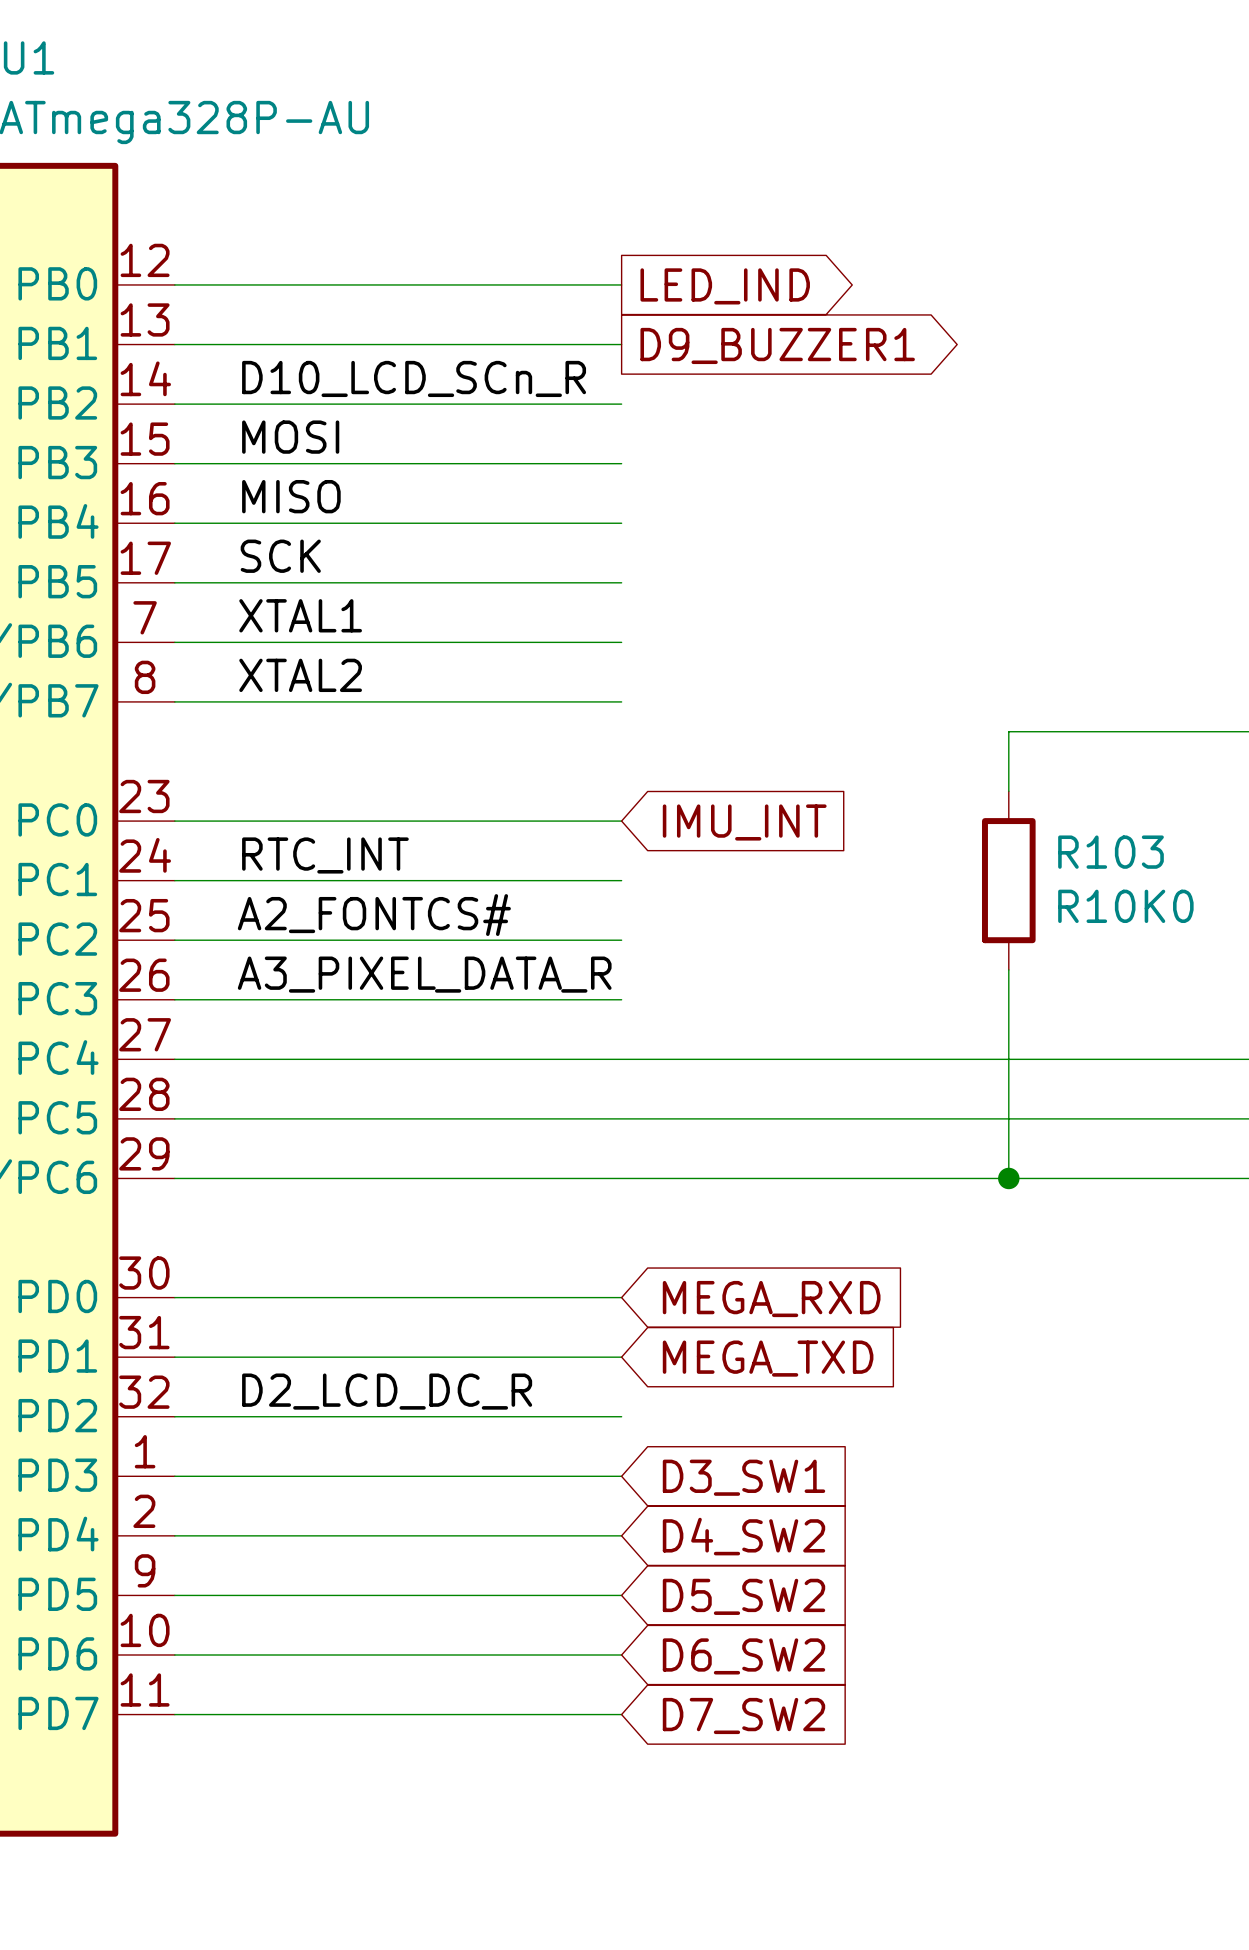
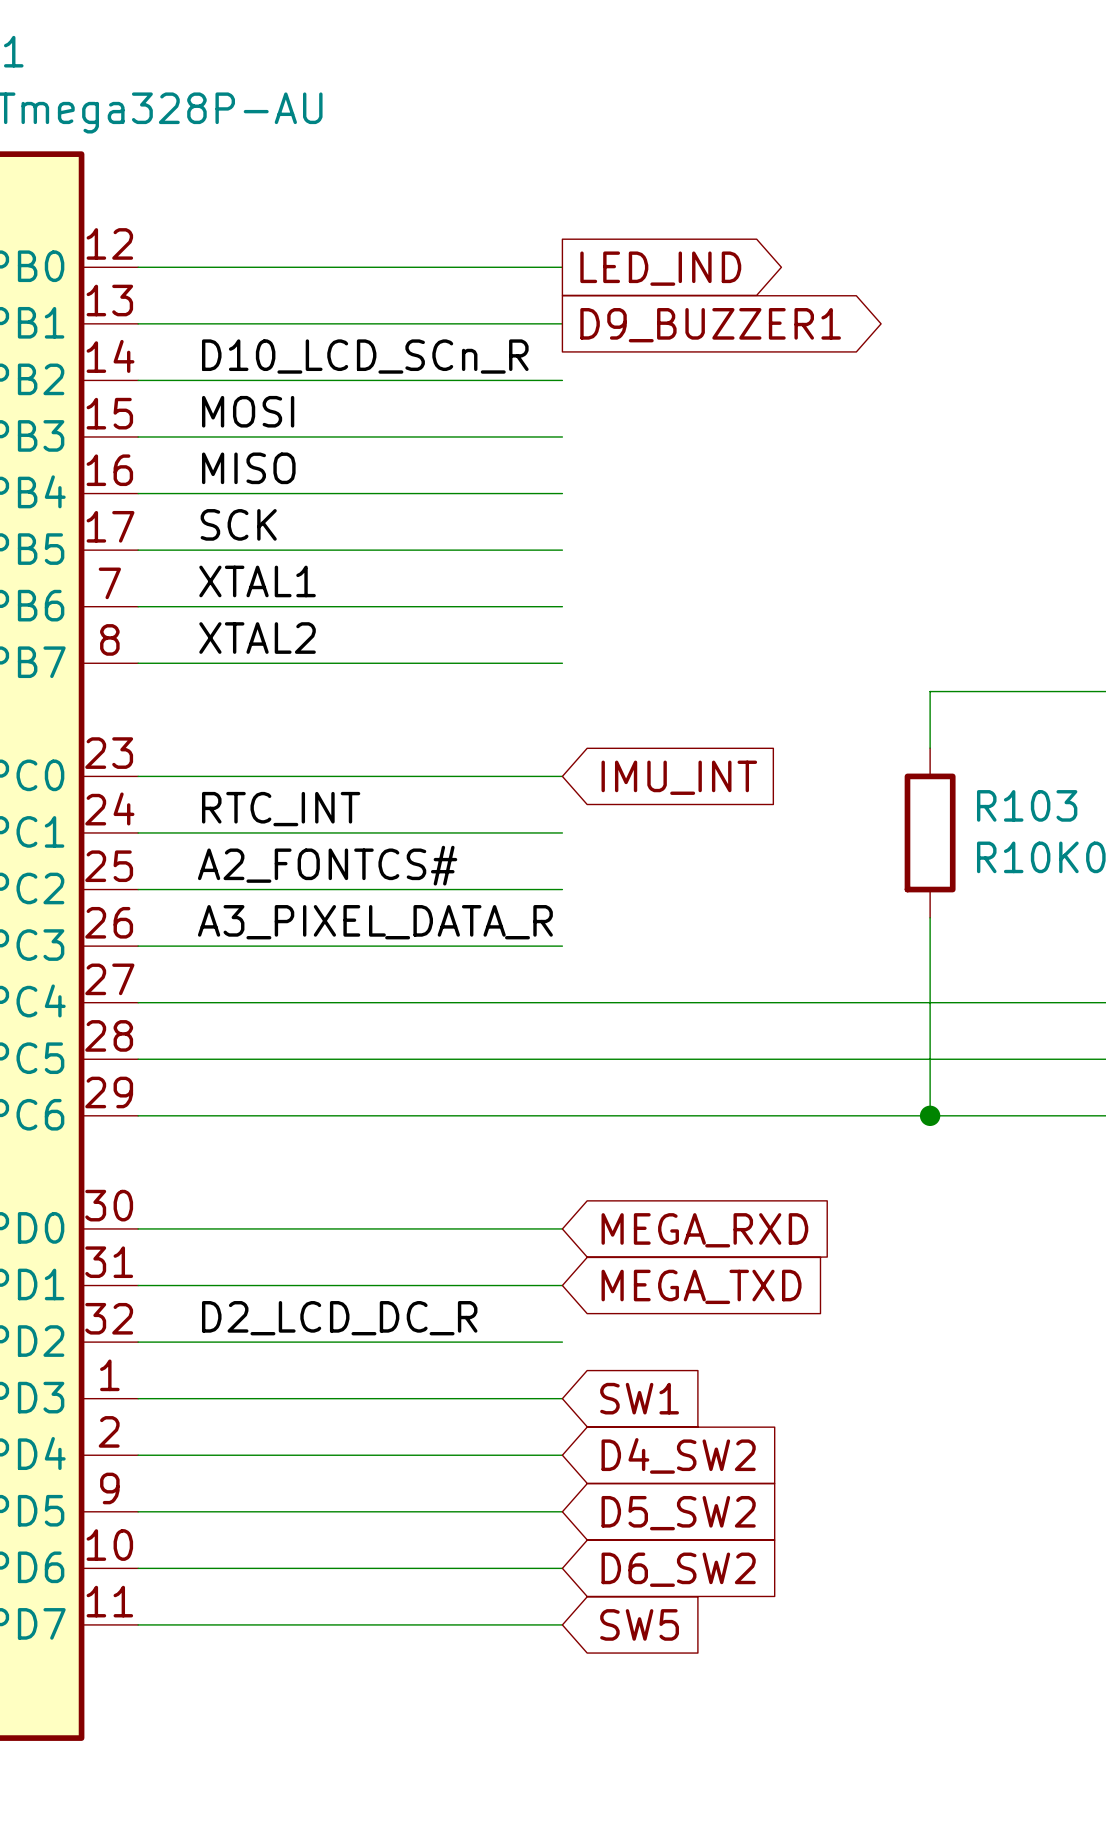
global label: D3_SW1 (743, 1477) -> SW1 (639, 1398)
global label: D7_SW2 (743, 1715) -> SW5 (639, 1624)

